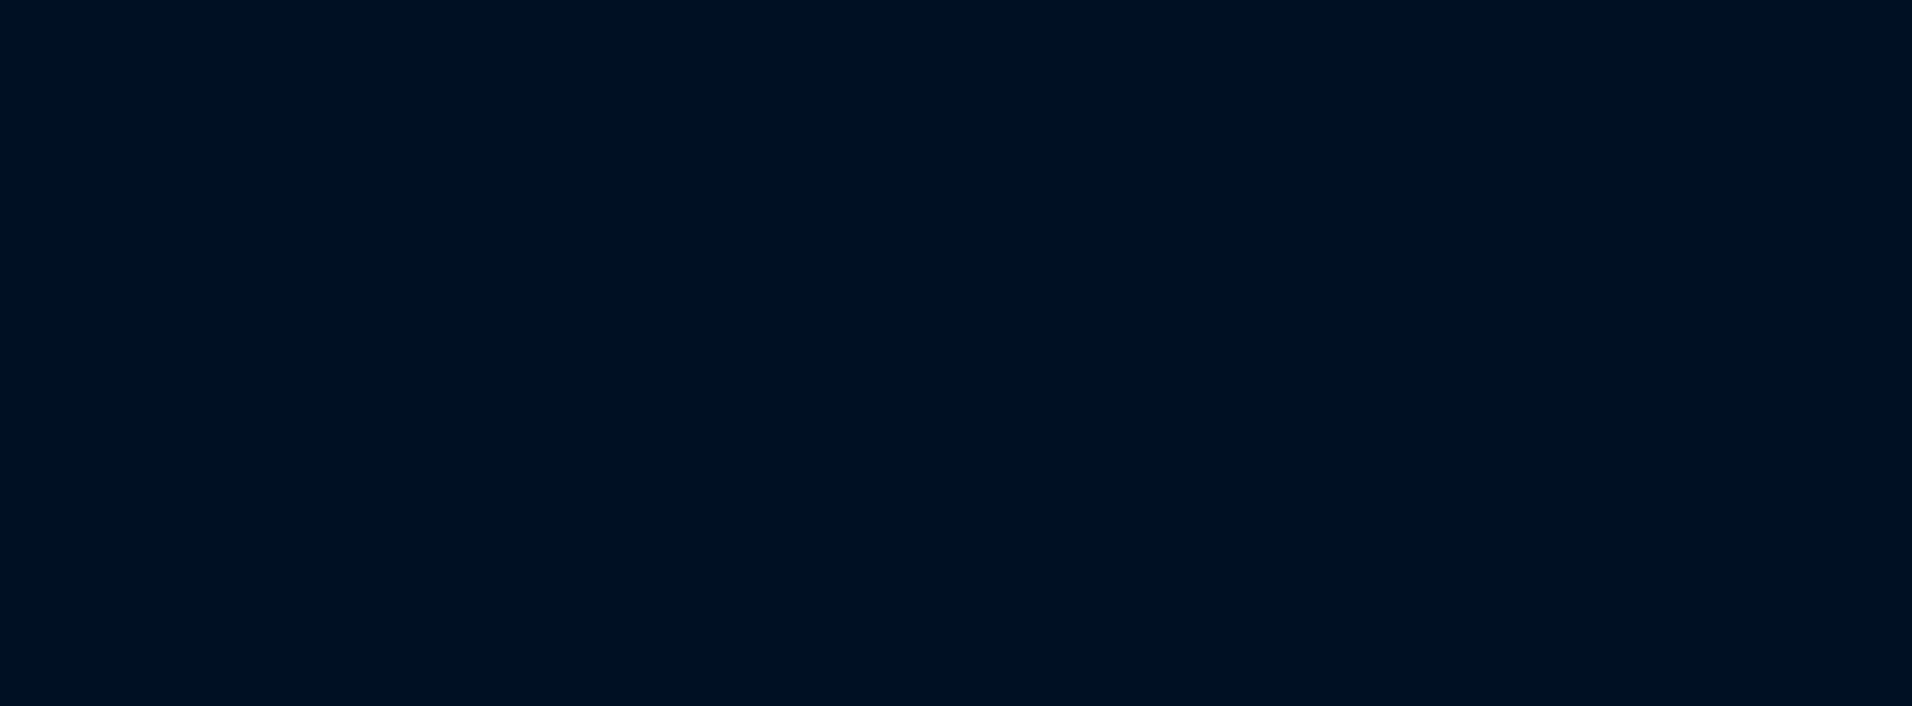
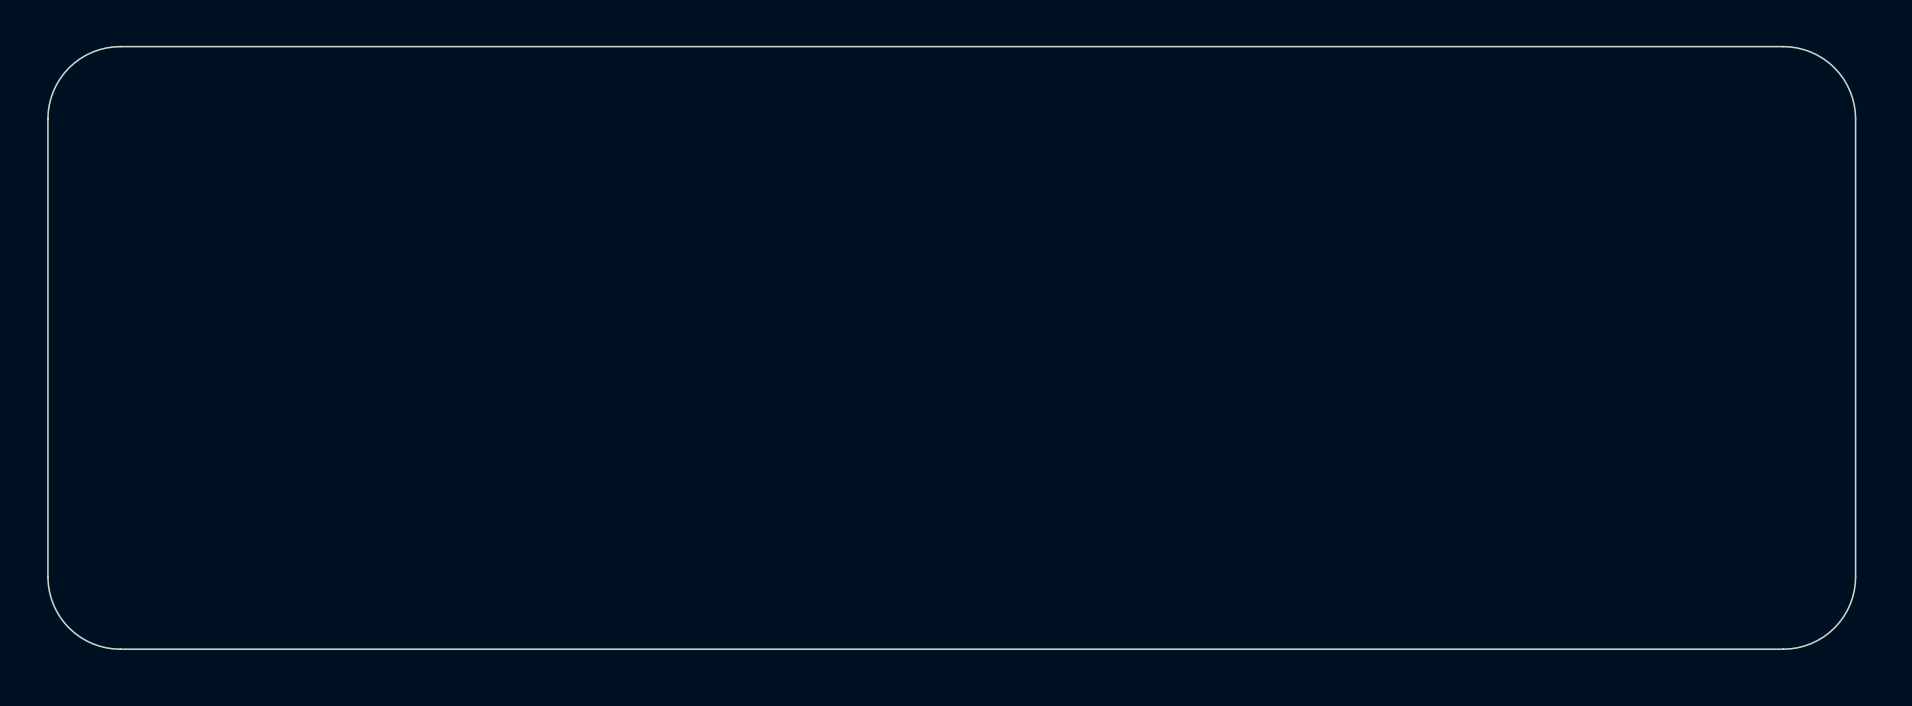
board edge: none -> (120, 46) (1783, 46) (1804, 49) (1823, 58) (1839, 73) (1850, 91) (1855, 111) (1855, 576) (1852, 597) (1843, 617) (1829, 632) (1810, 643) (1783, 649) (120, 649) (99, 646) (80, 637) (64, 622) (53, 604) (48, 584) (47, 118) (53, 91) (69, 67) (92, 52) (120, 46)

